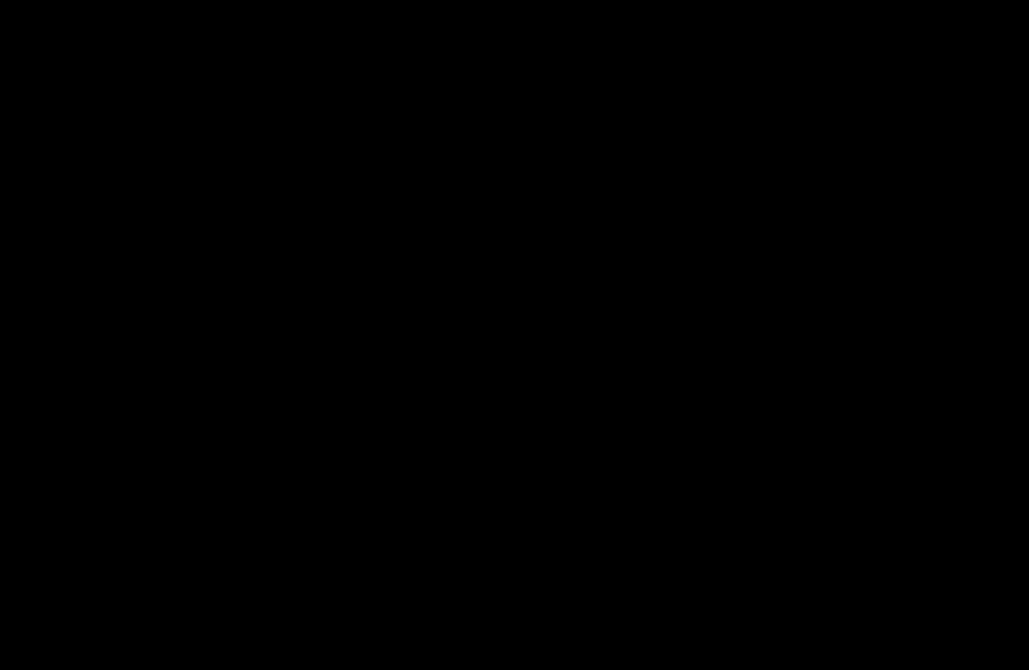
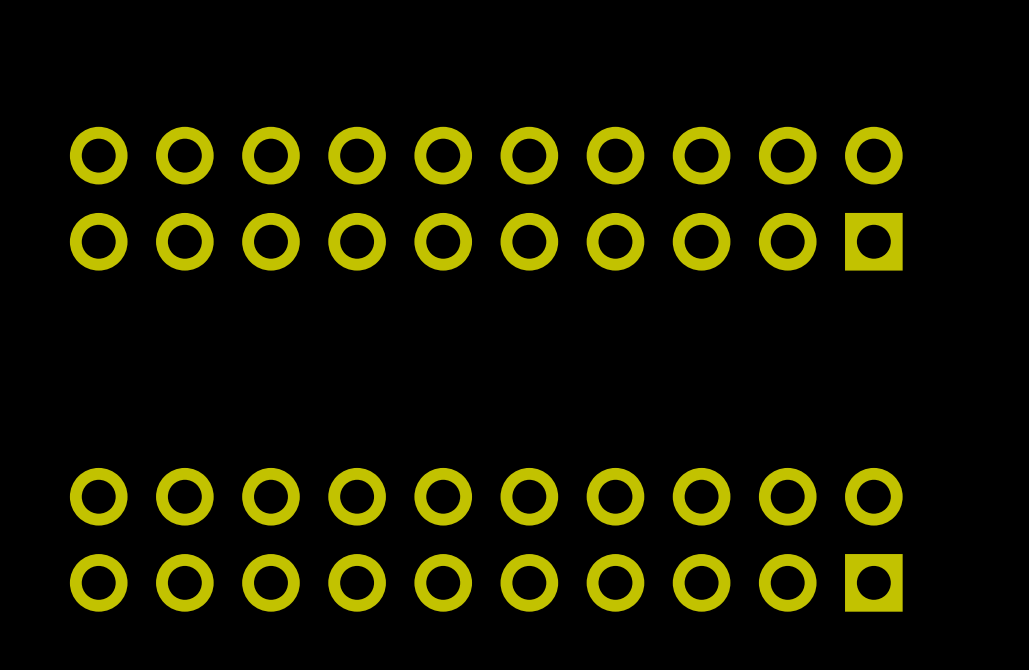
part: none -> (486, 198)
part: none -> (486, 539)

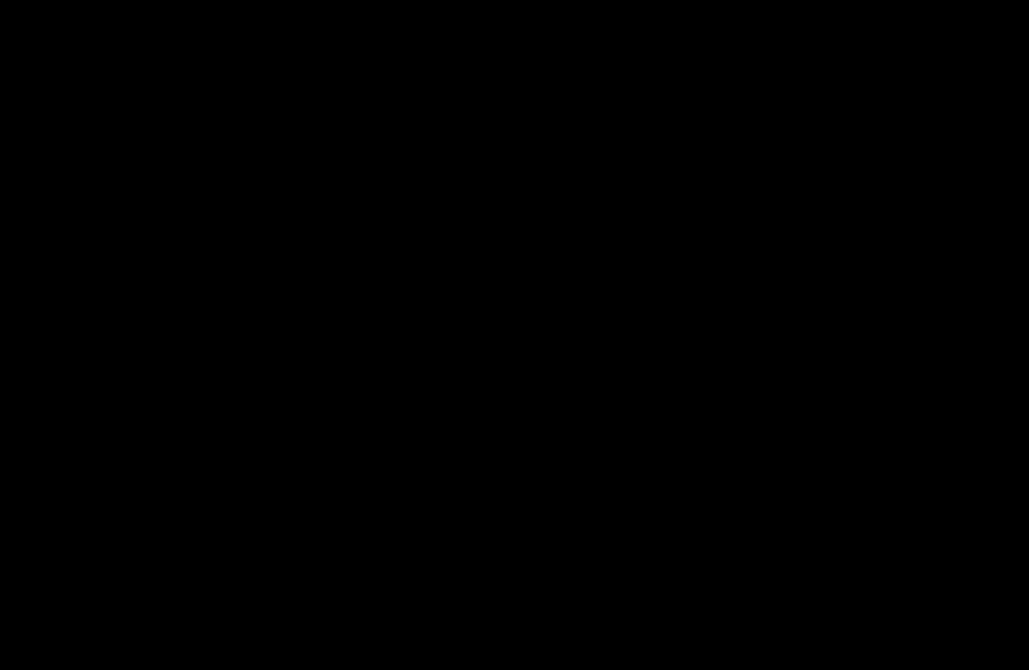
part: (486, 198) -> none
part: (486, 539) -> none

